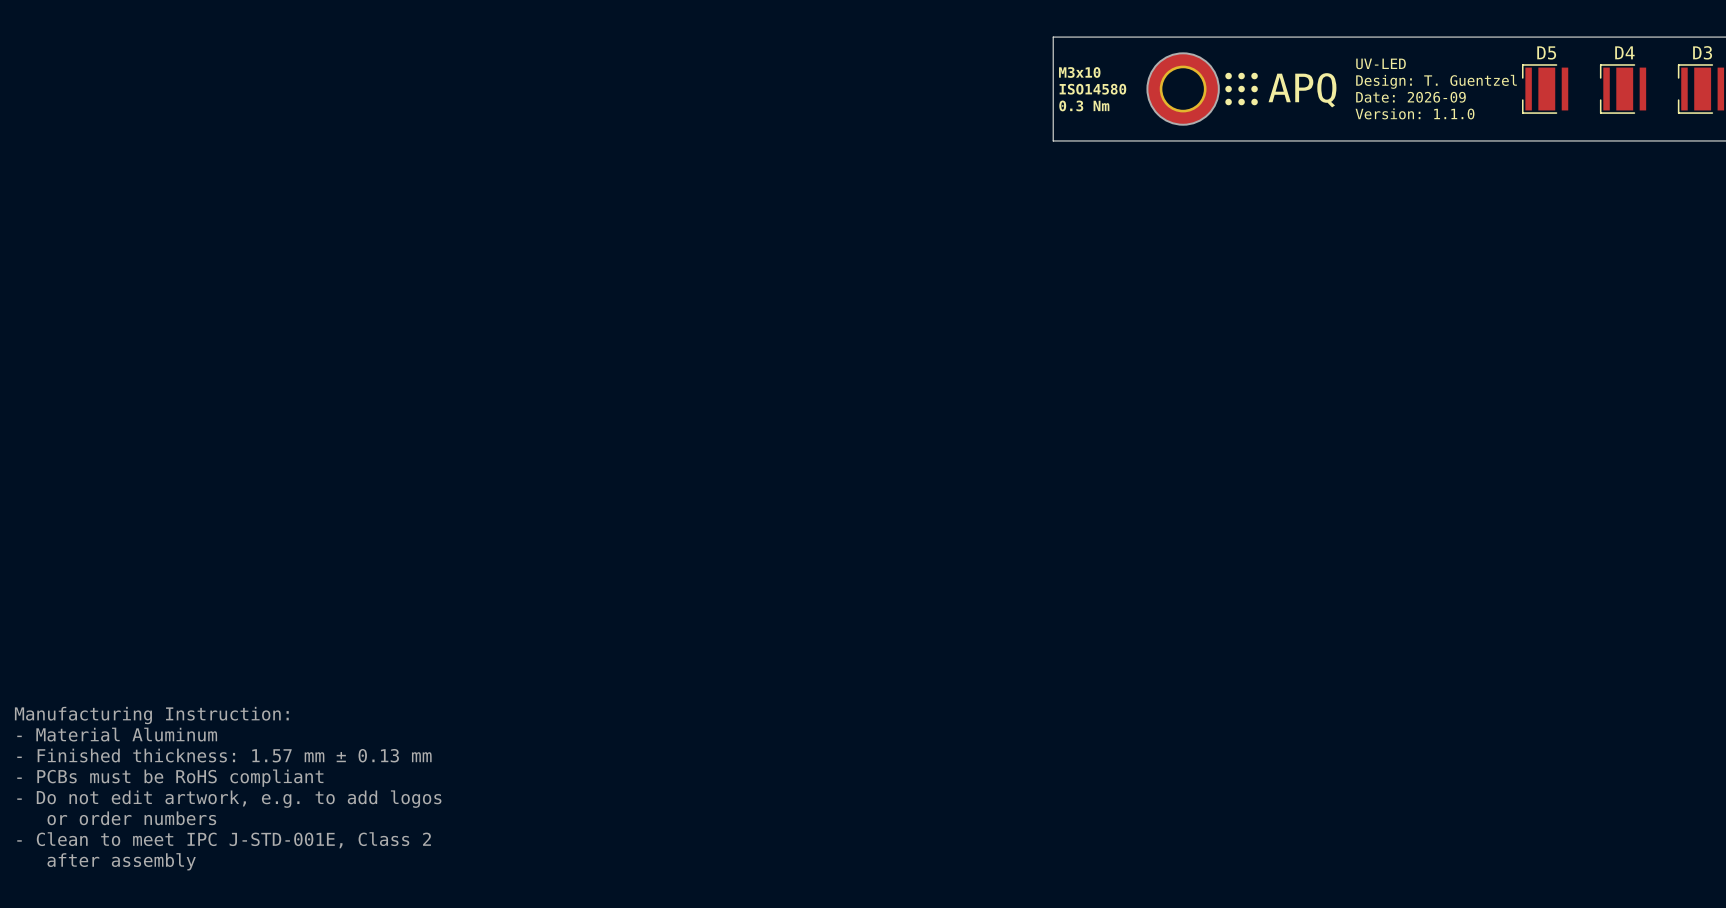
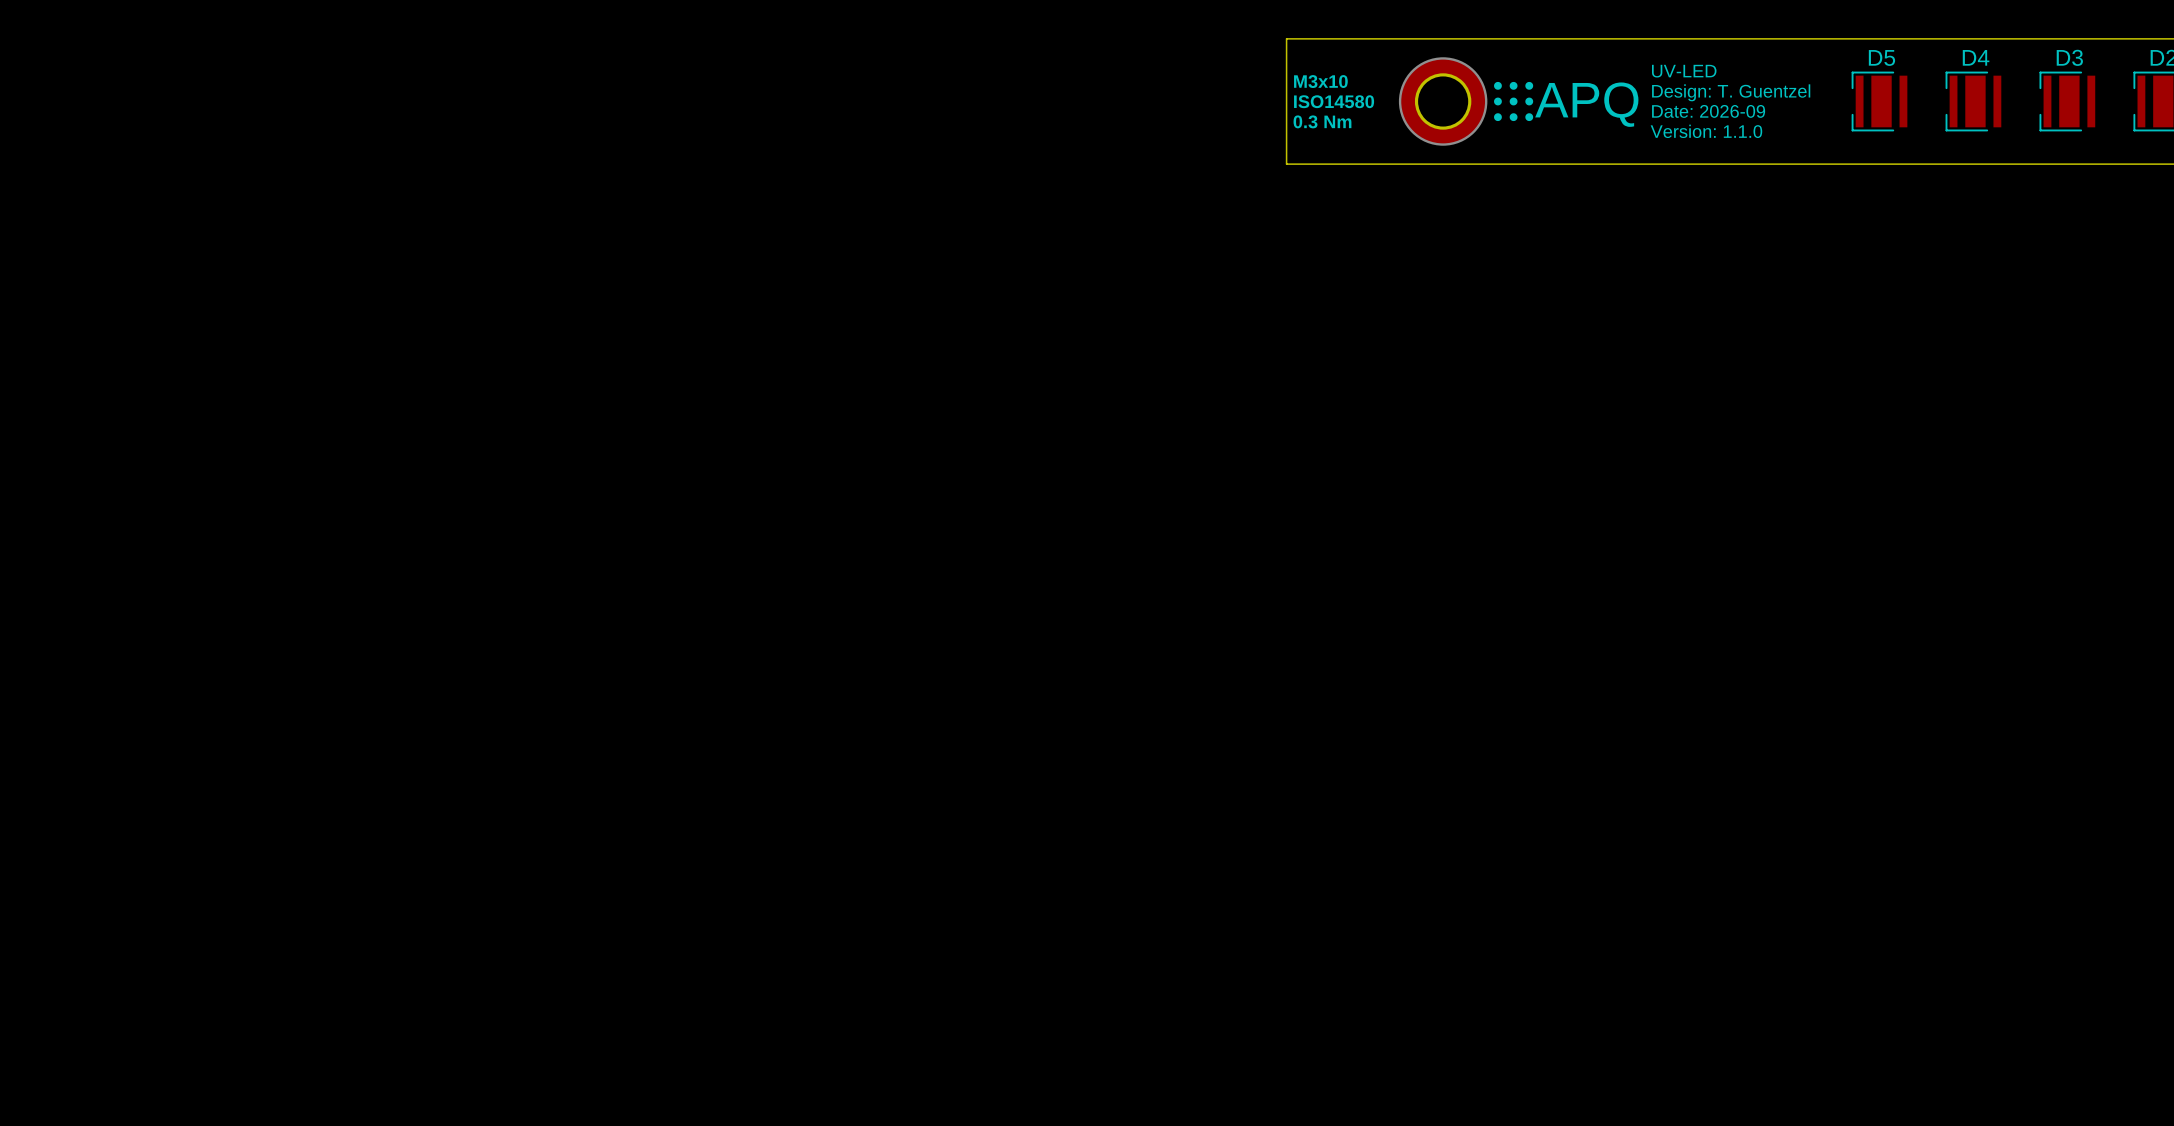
text: Manufacturing Instruction: (151, 715) -> none
text: - Material Aluminum (117, 734) -> none
text: - Finished thickness: 1.57 mm ± 0.13 mm (224, 755) -> none
text: - PCBs must be RoHS compliant (170, 778) -> none
text: - Do not edit artwork, e.g. to add logos (229, 799) -> none
text: or order numbers (131, 818) -> none
text: - Clean to meet IPC J-STD-001E, Class 2 (224, 840) -> none
text: after assembly (121, 861) -> none

